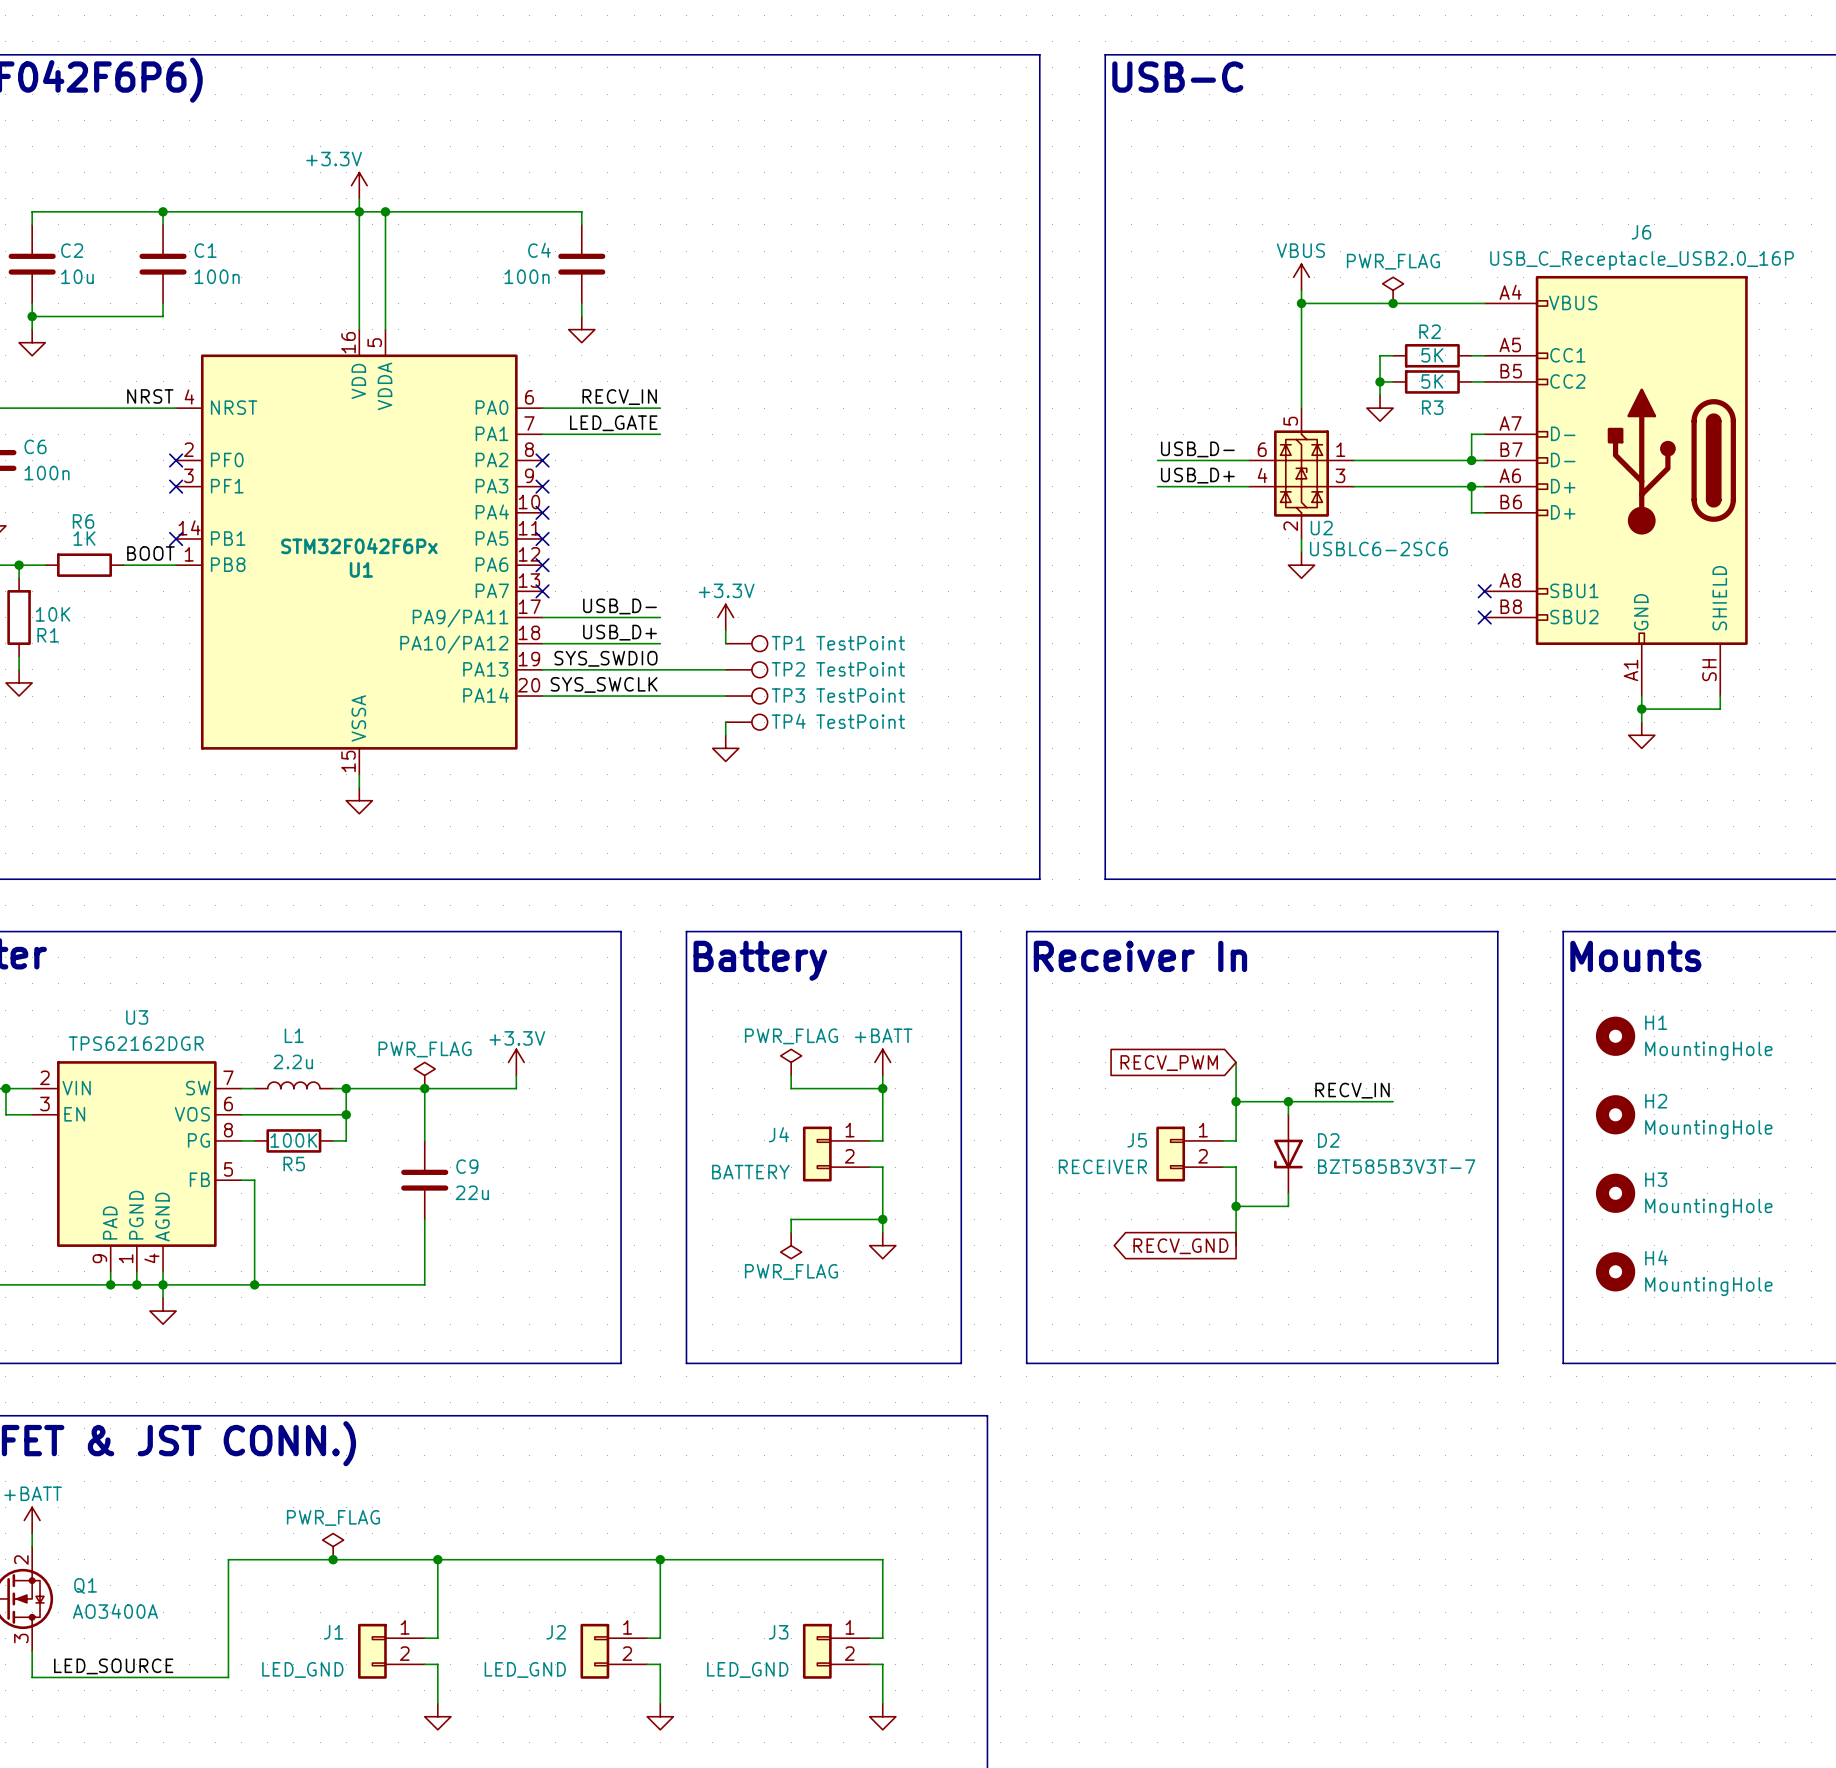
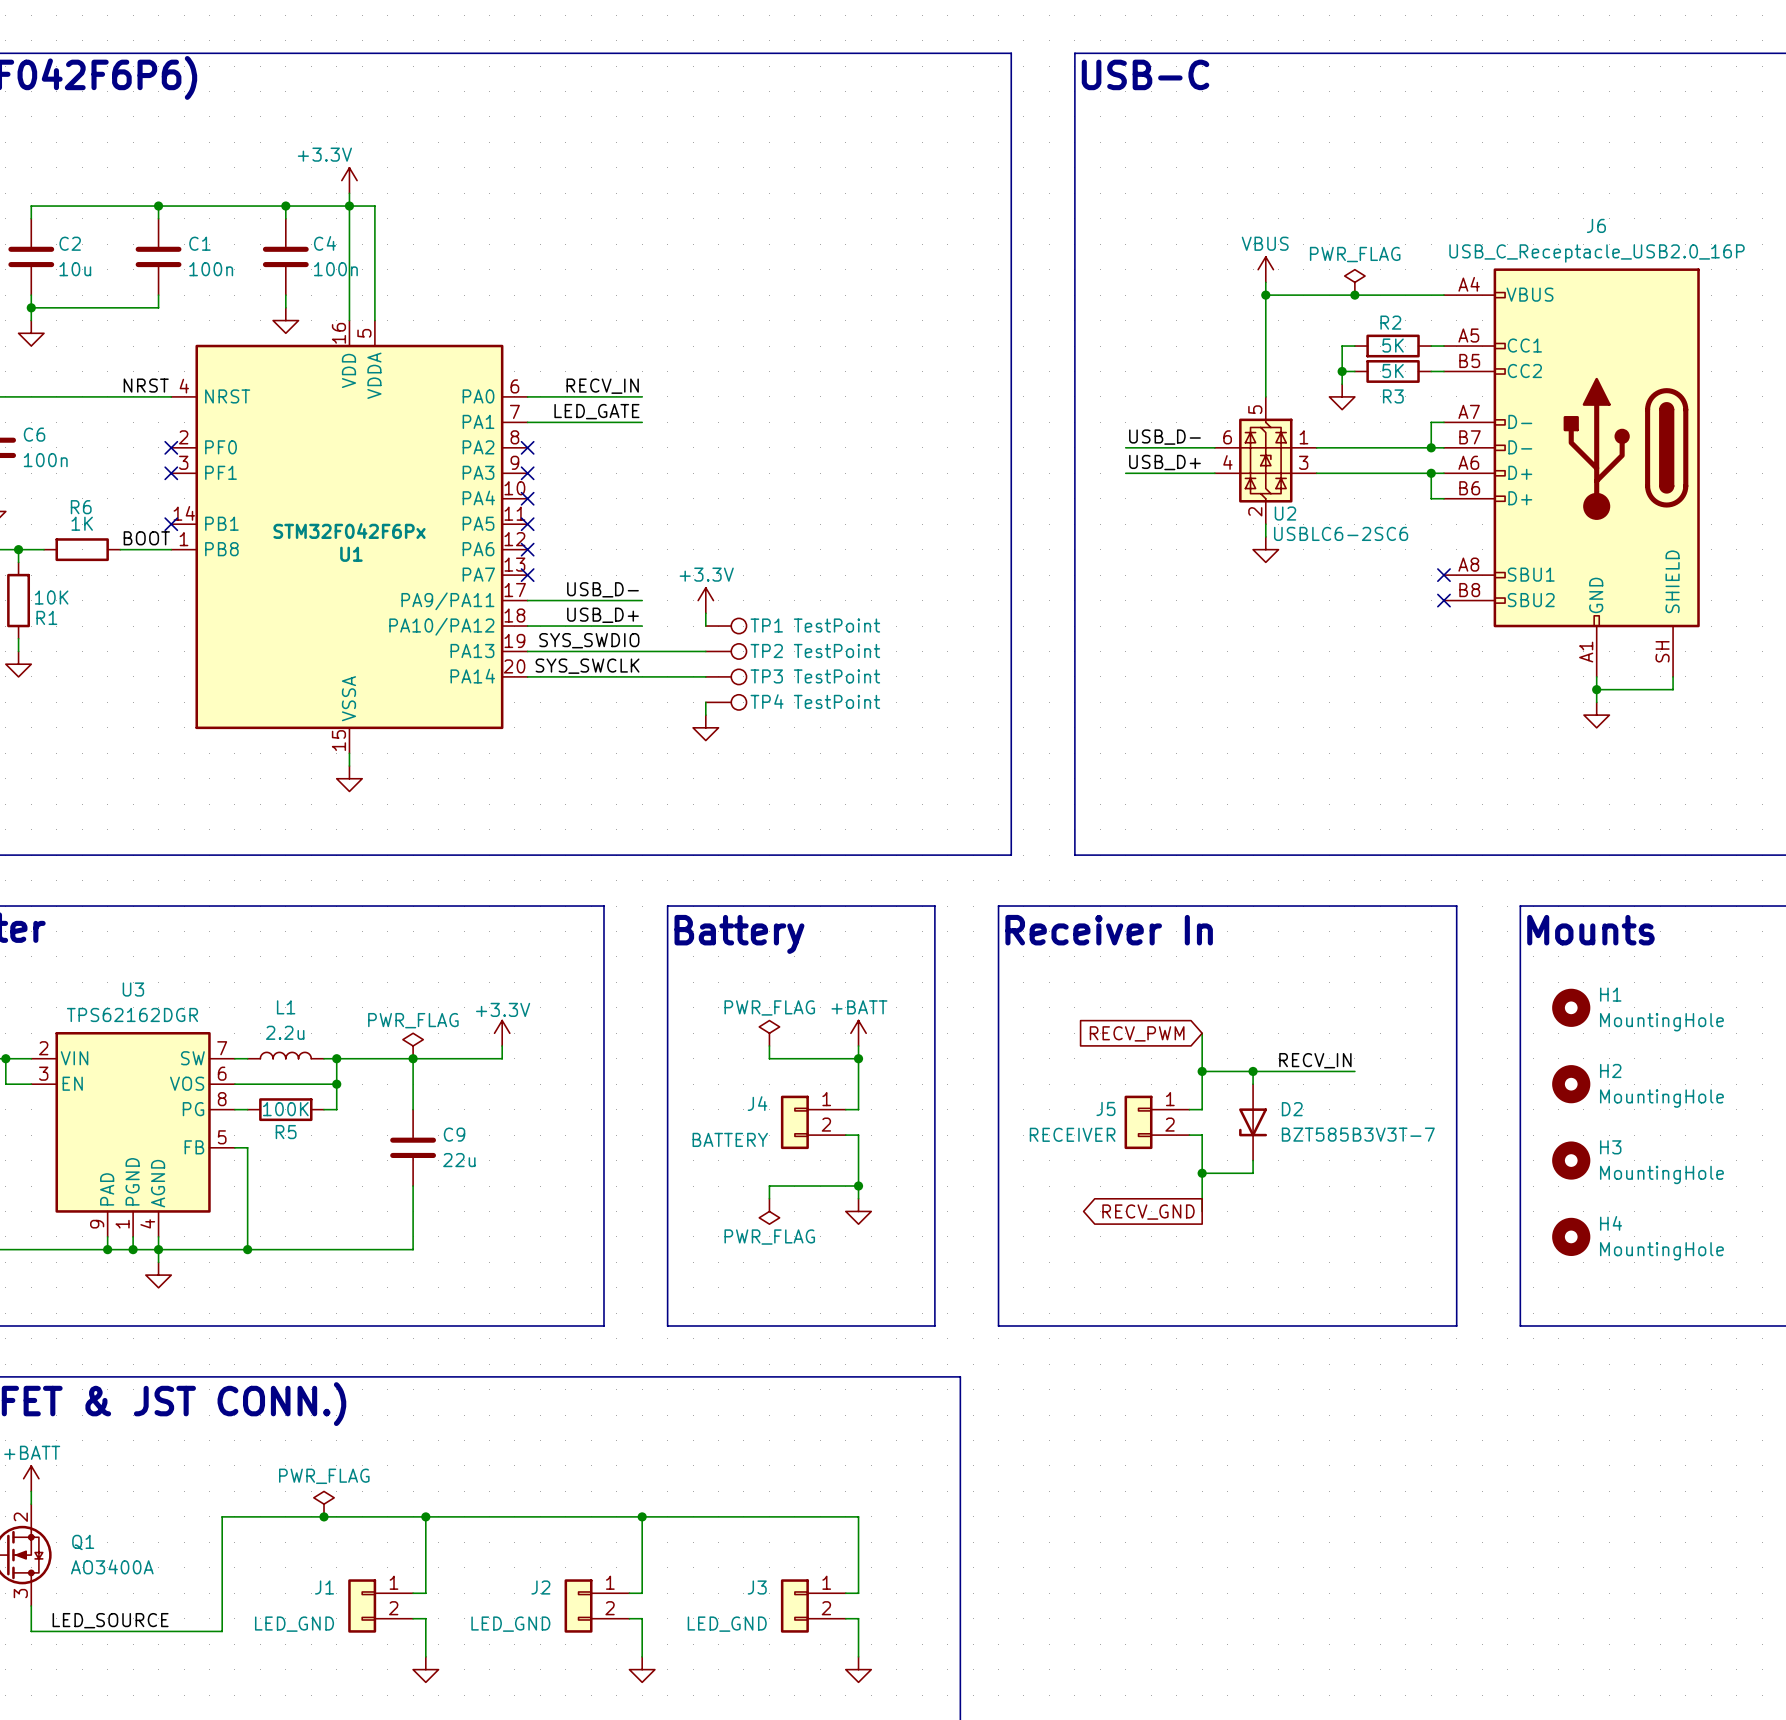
wire: none -> (285, 206) (285, 218)
junction: none -> (285, 206)
wire: (385, 211) (581, 211) (581, 224) -> none
junction: (385, 211) -> none
C4 name position: C4 (539, 250) -> C4 (325, 243)
C4 position: (581, 264) -> (285, 256)
C4 value position: 100n (527, 276) -> 100n (335, 269)
wire: none -> (285, 295) (285, 307)
wire: (581, 303) (581, 316) -> none
power symbol: none -> (285, 320)
power symbol: (581, 329) -> none

